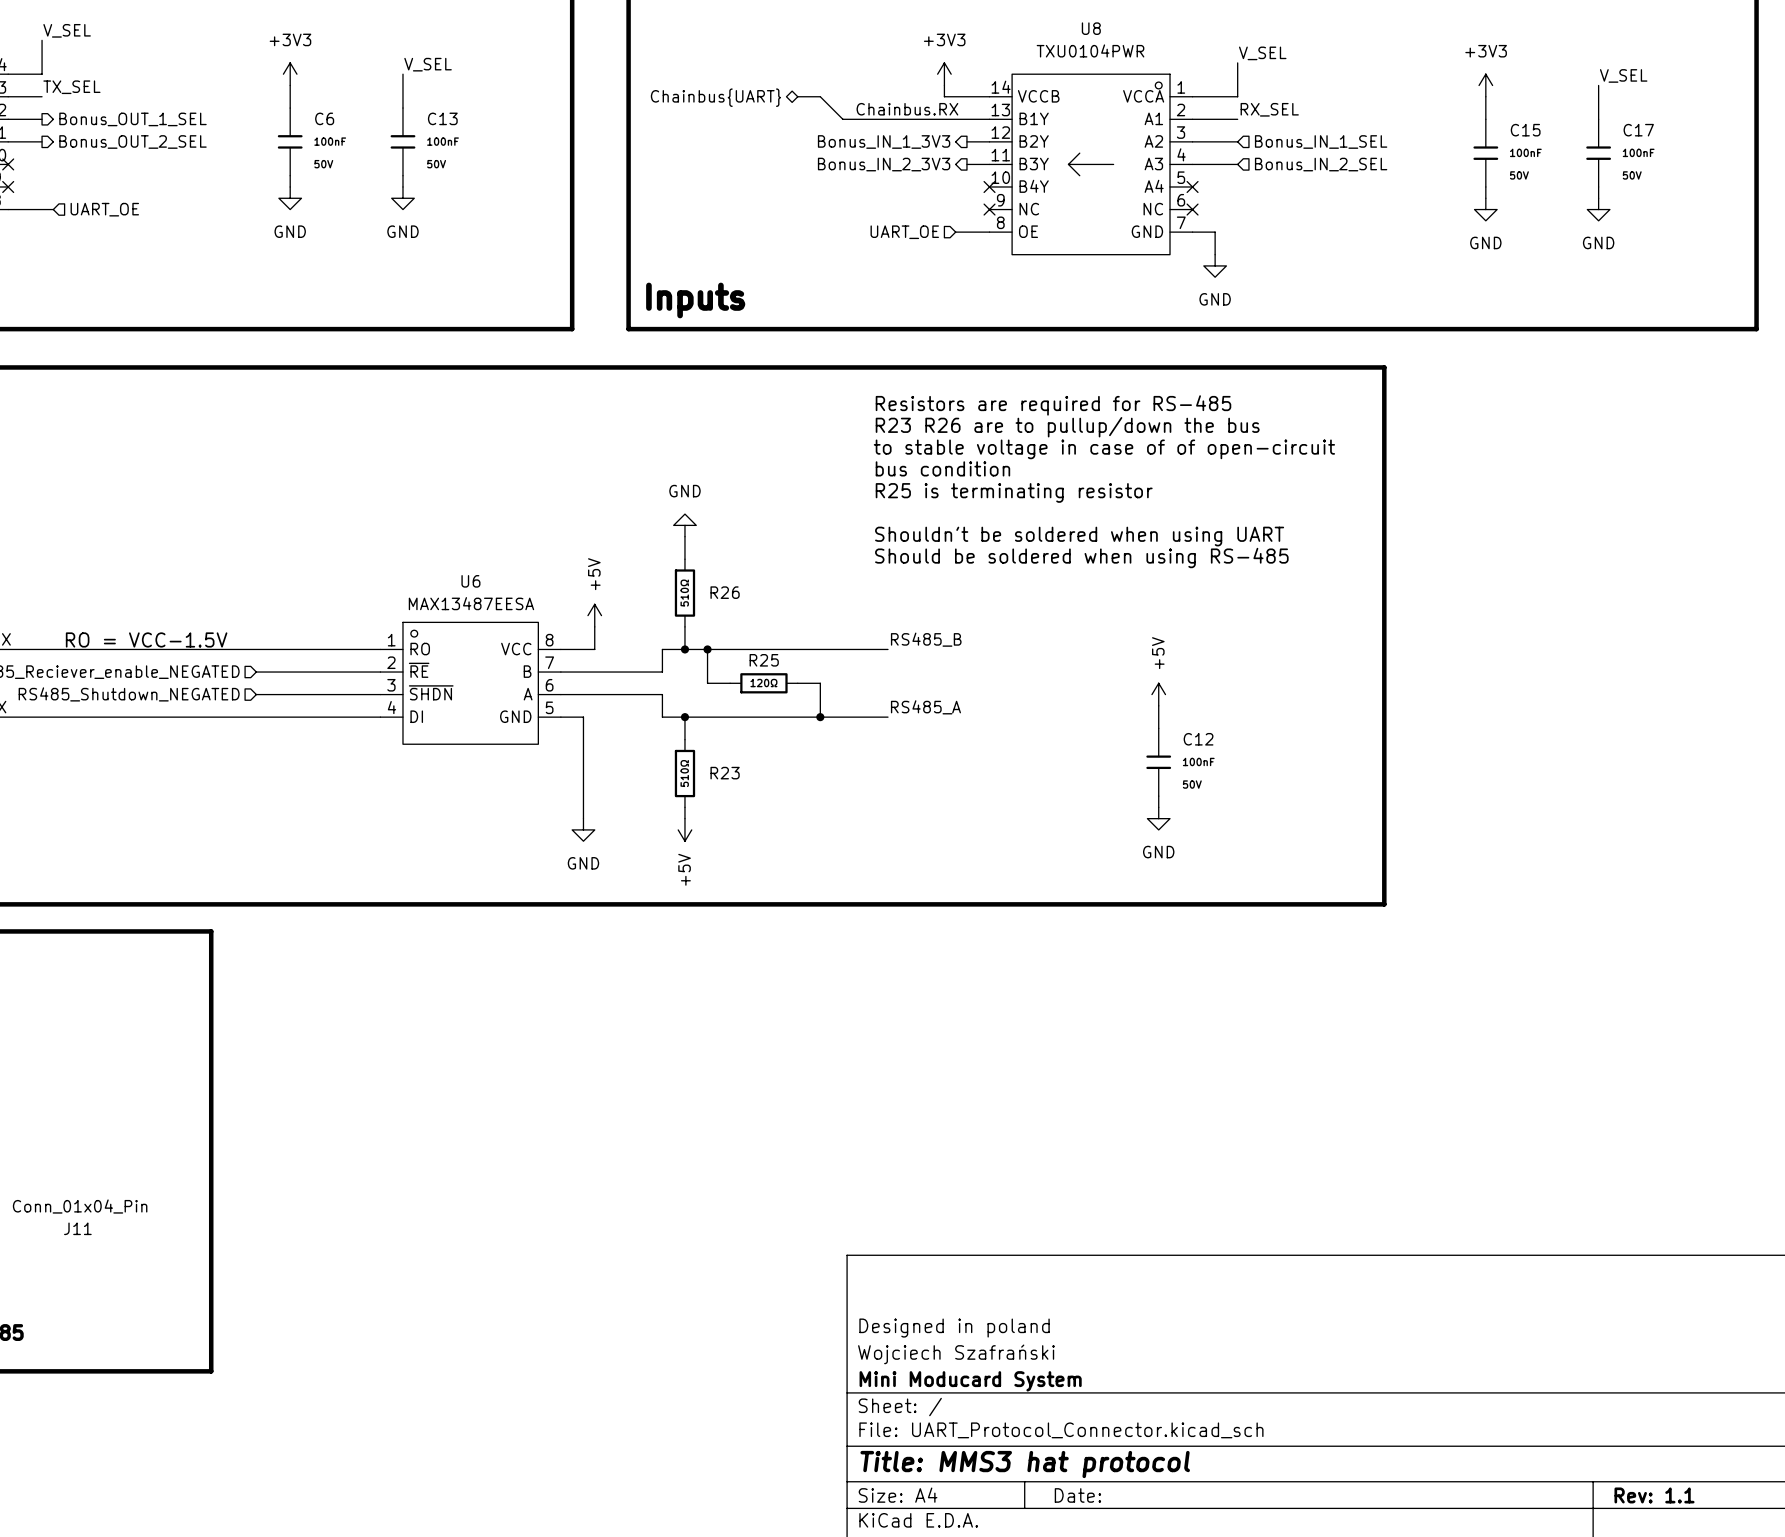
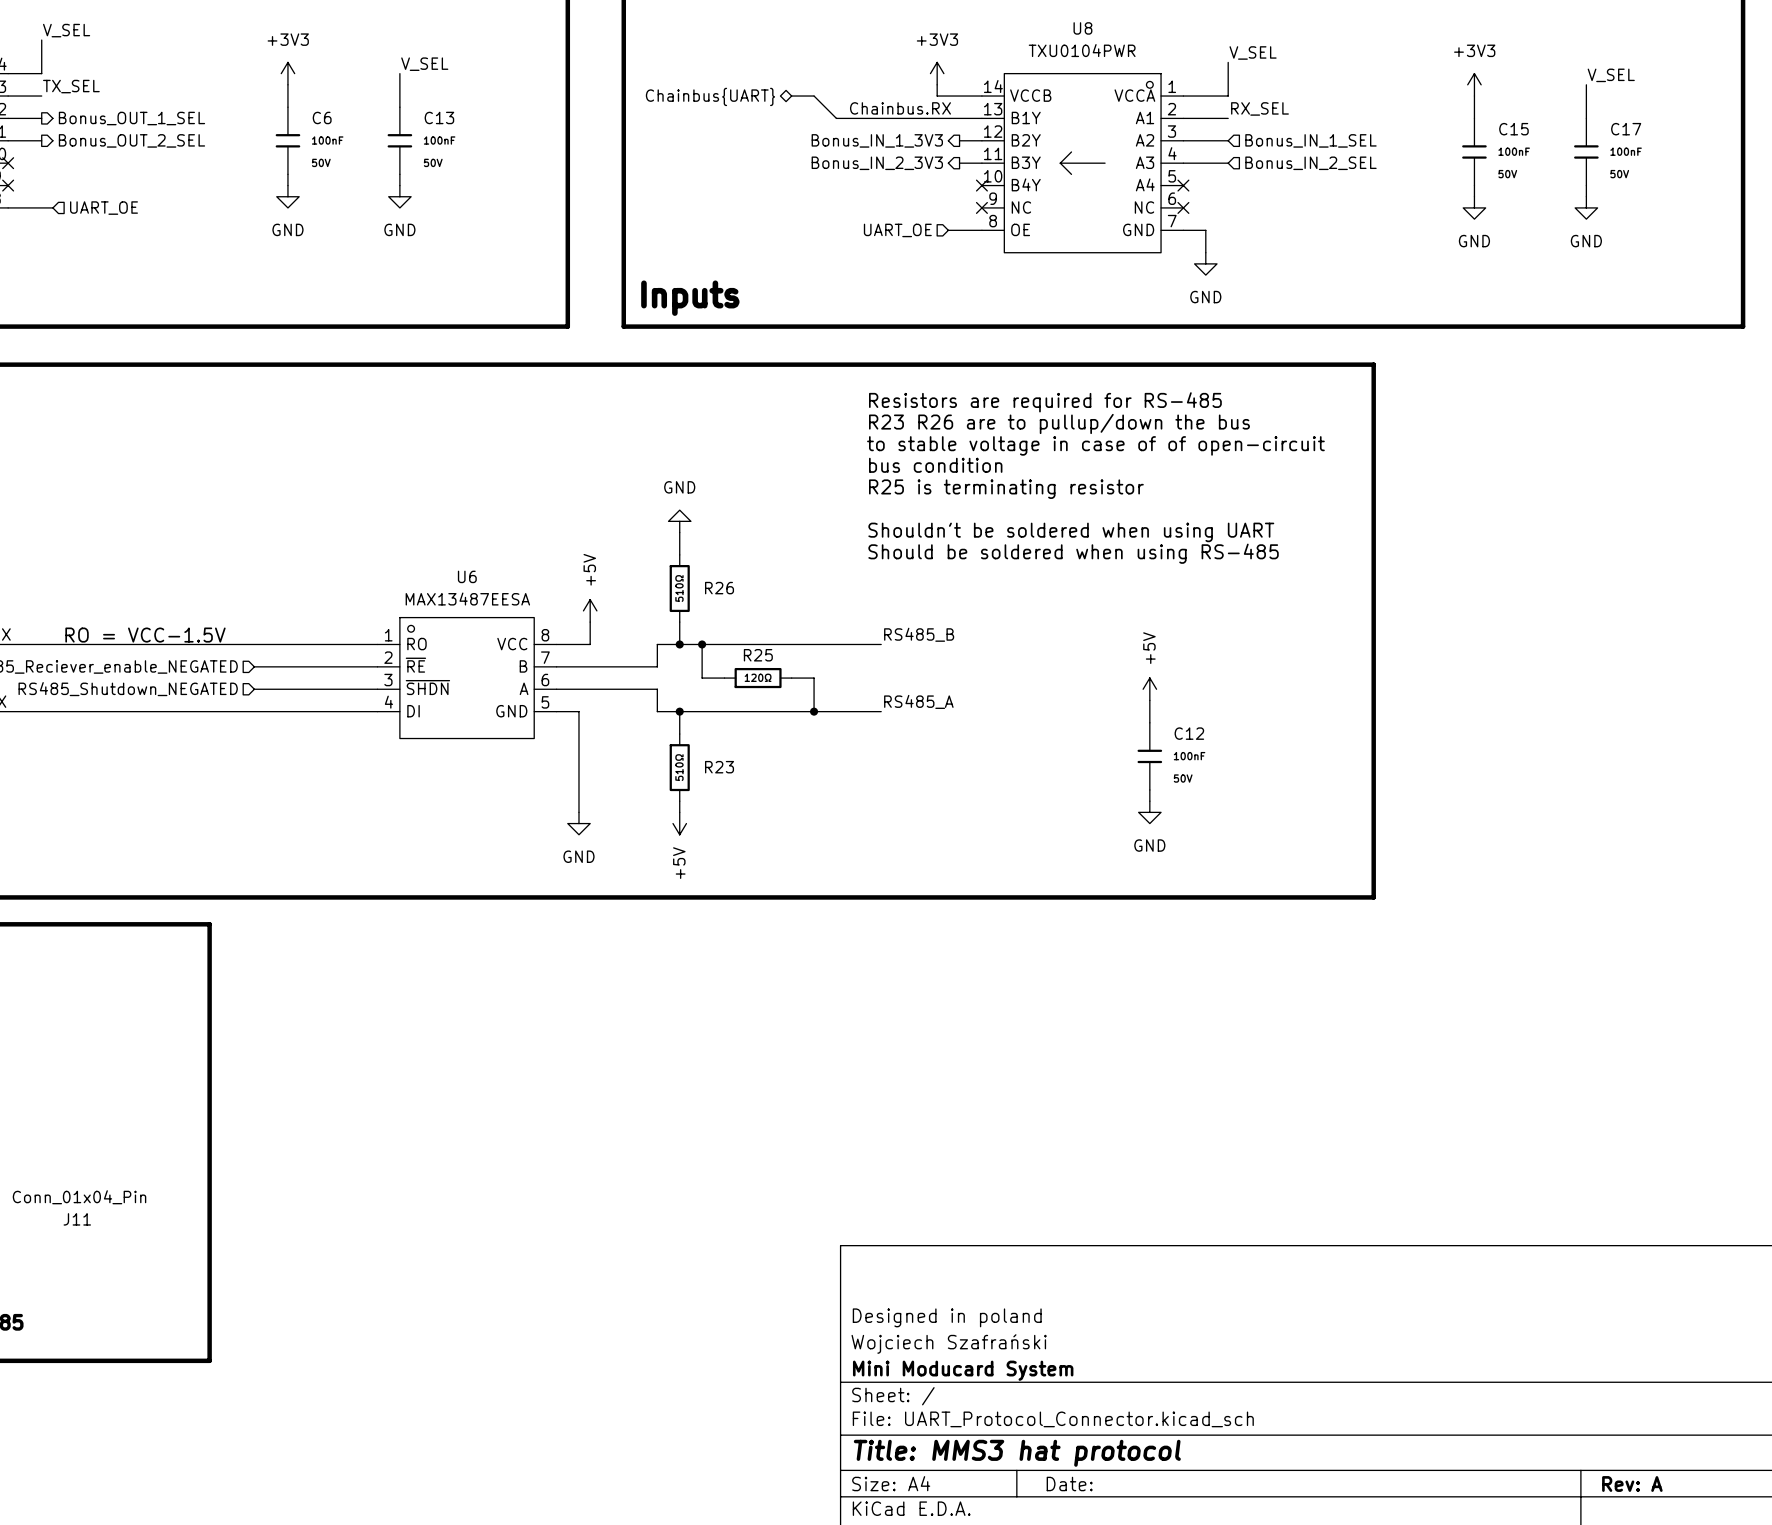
title block: Rev: 1.1 (1654, 1495) -> Rev: A (1632, 1483)

